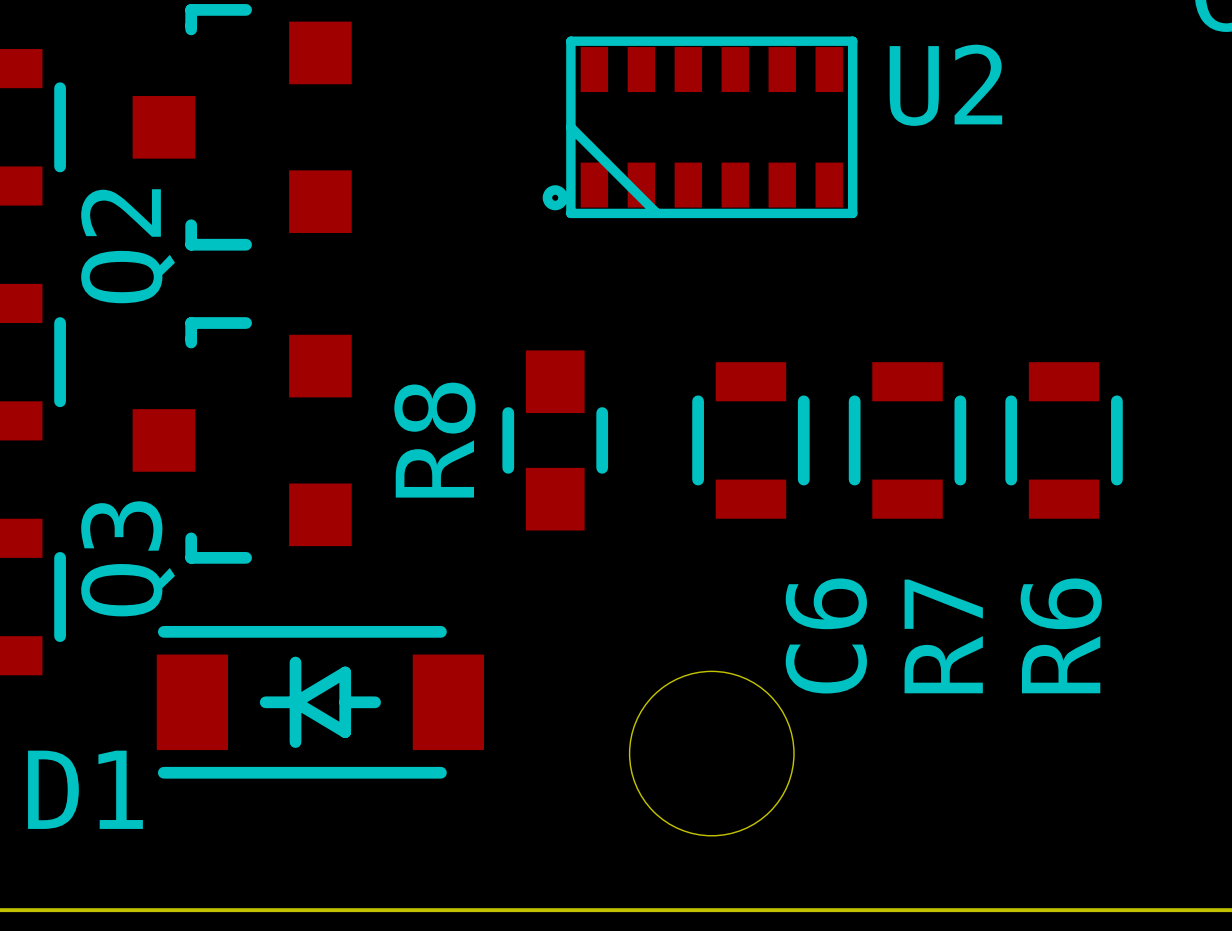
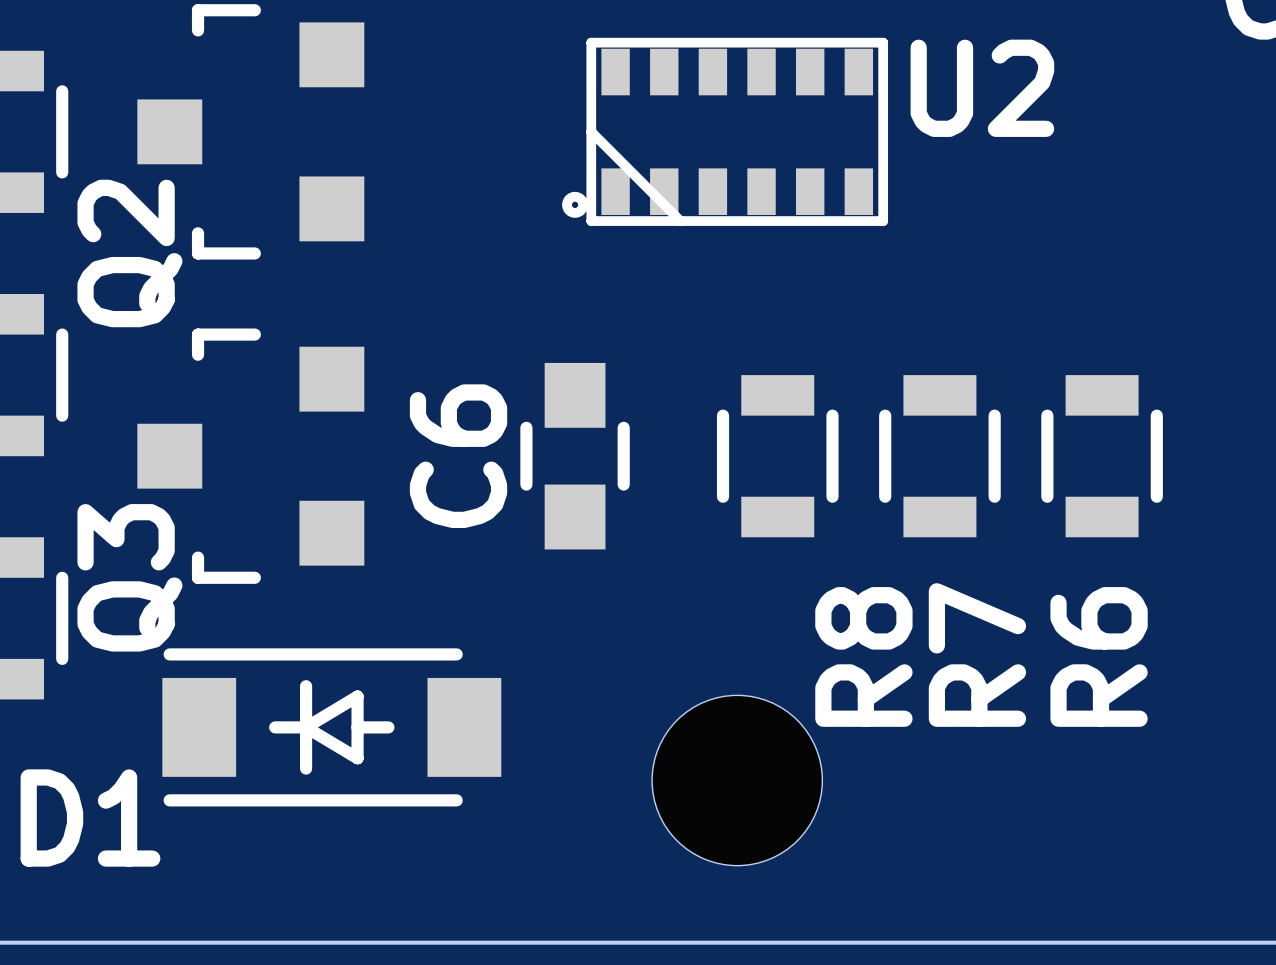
R8 name position: R8 (434, 440) -> R8 (863, 656)
C6 name position: C6 (826, 635) -> C6 (458, 456)

